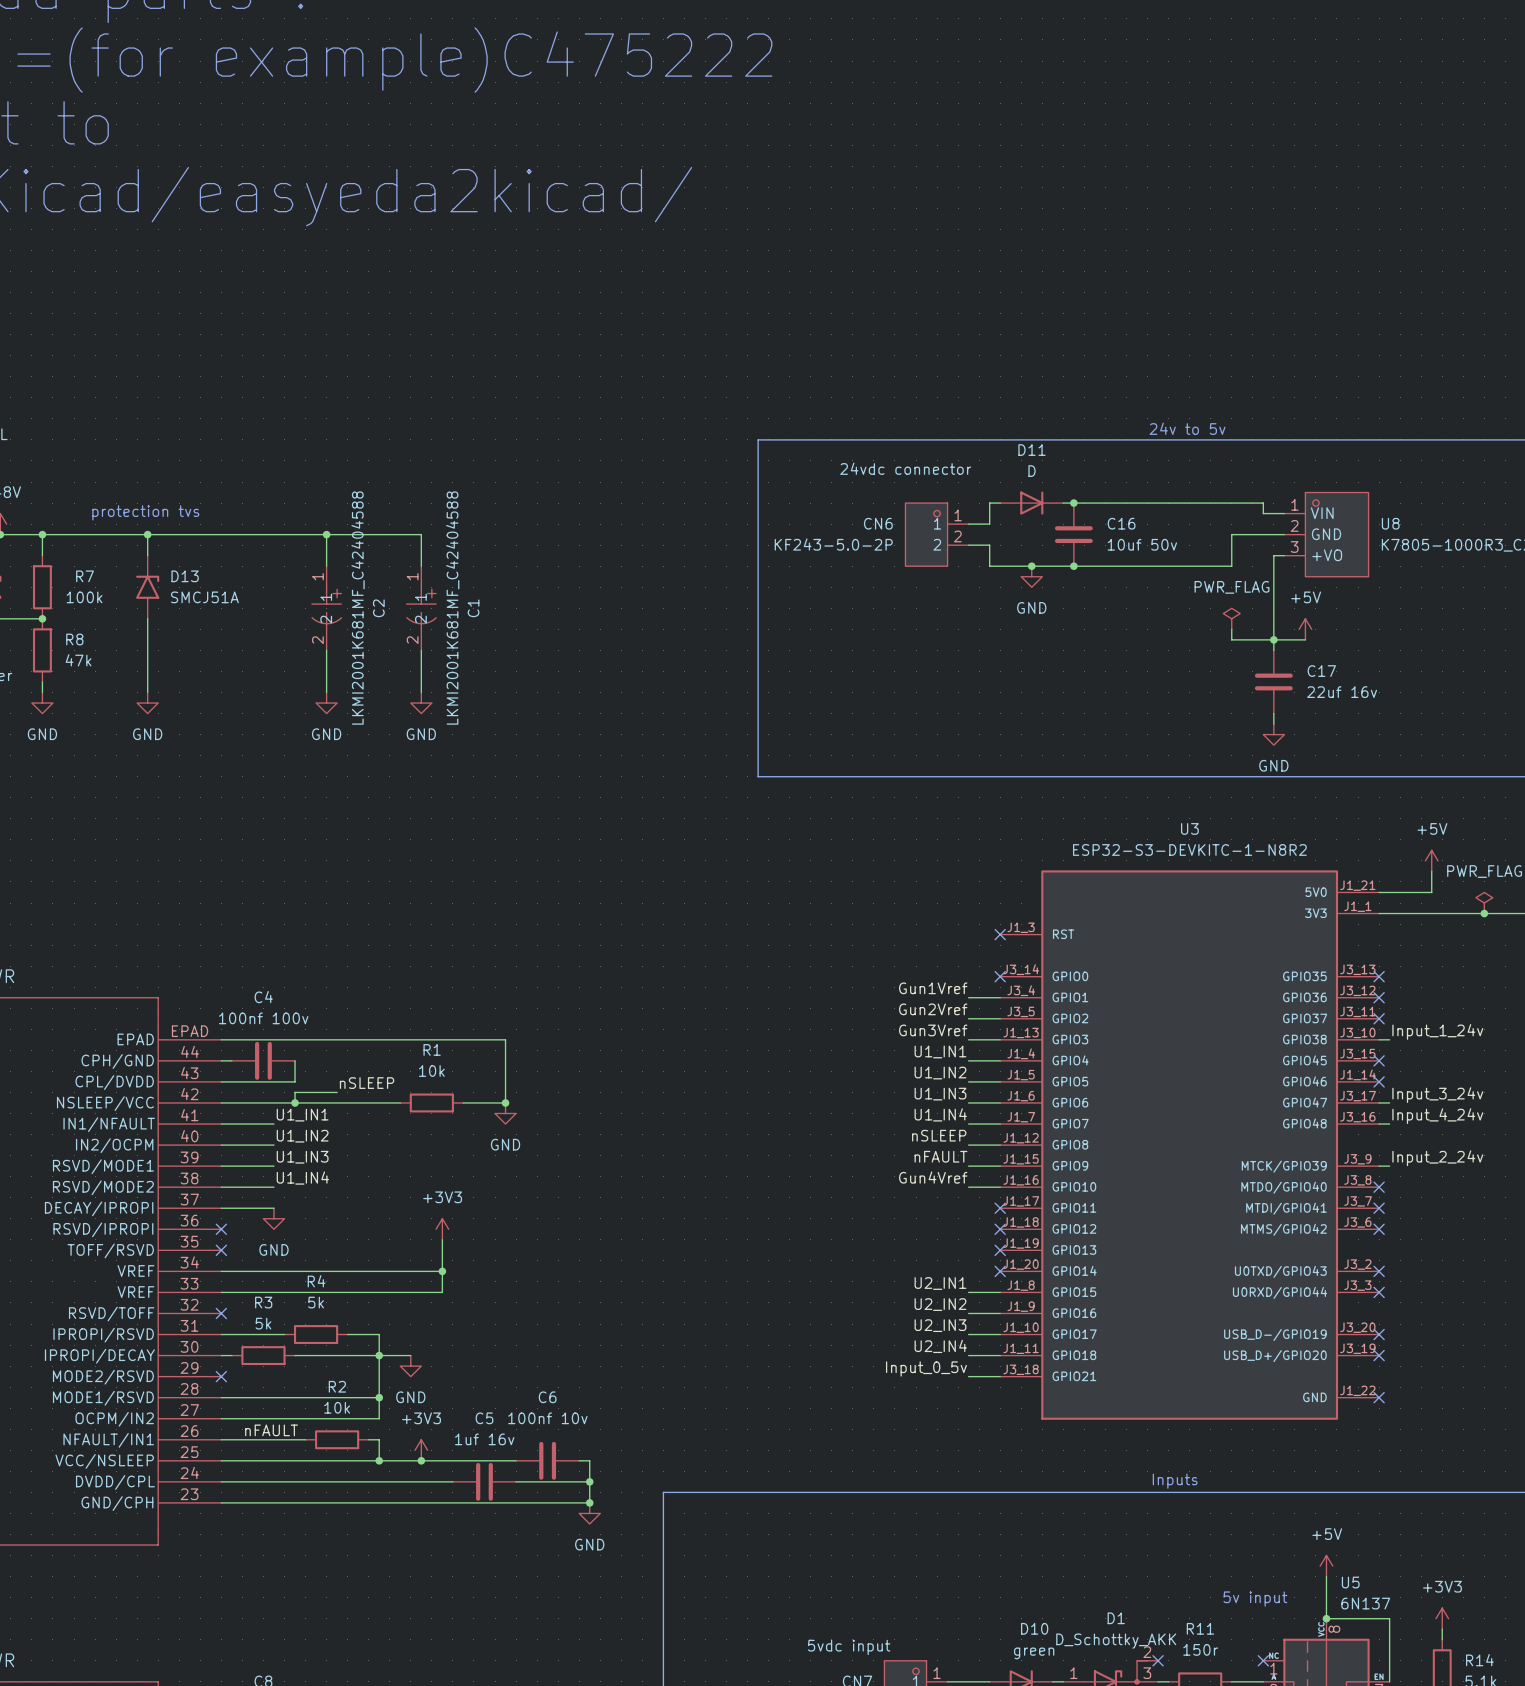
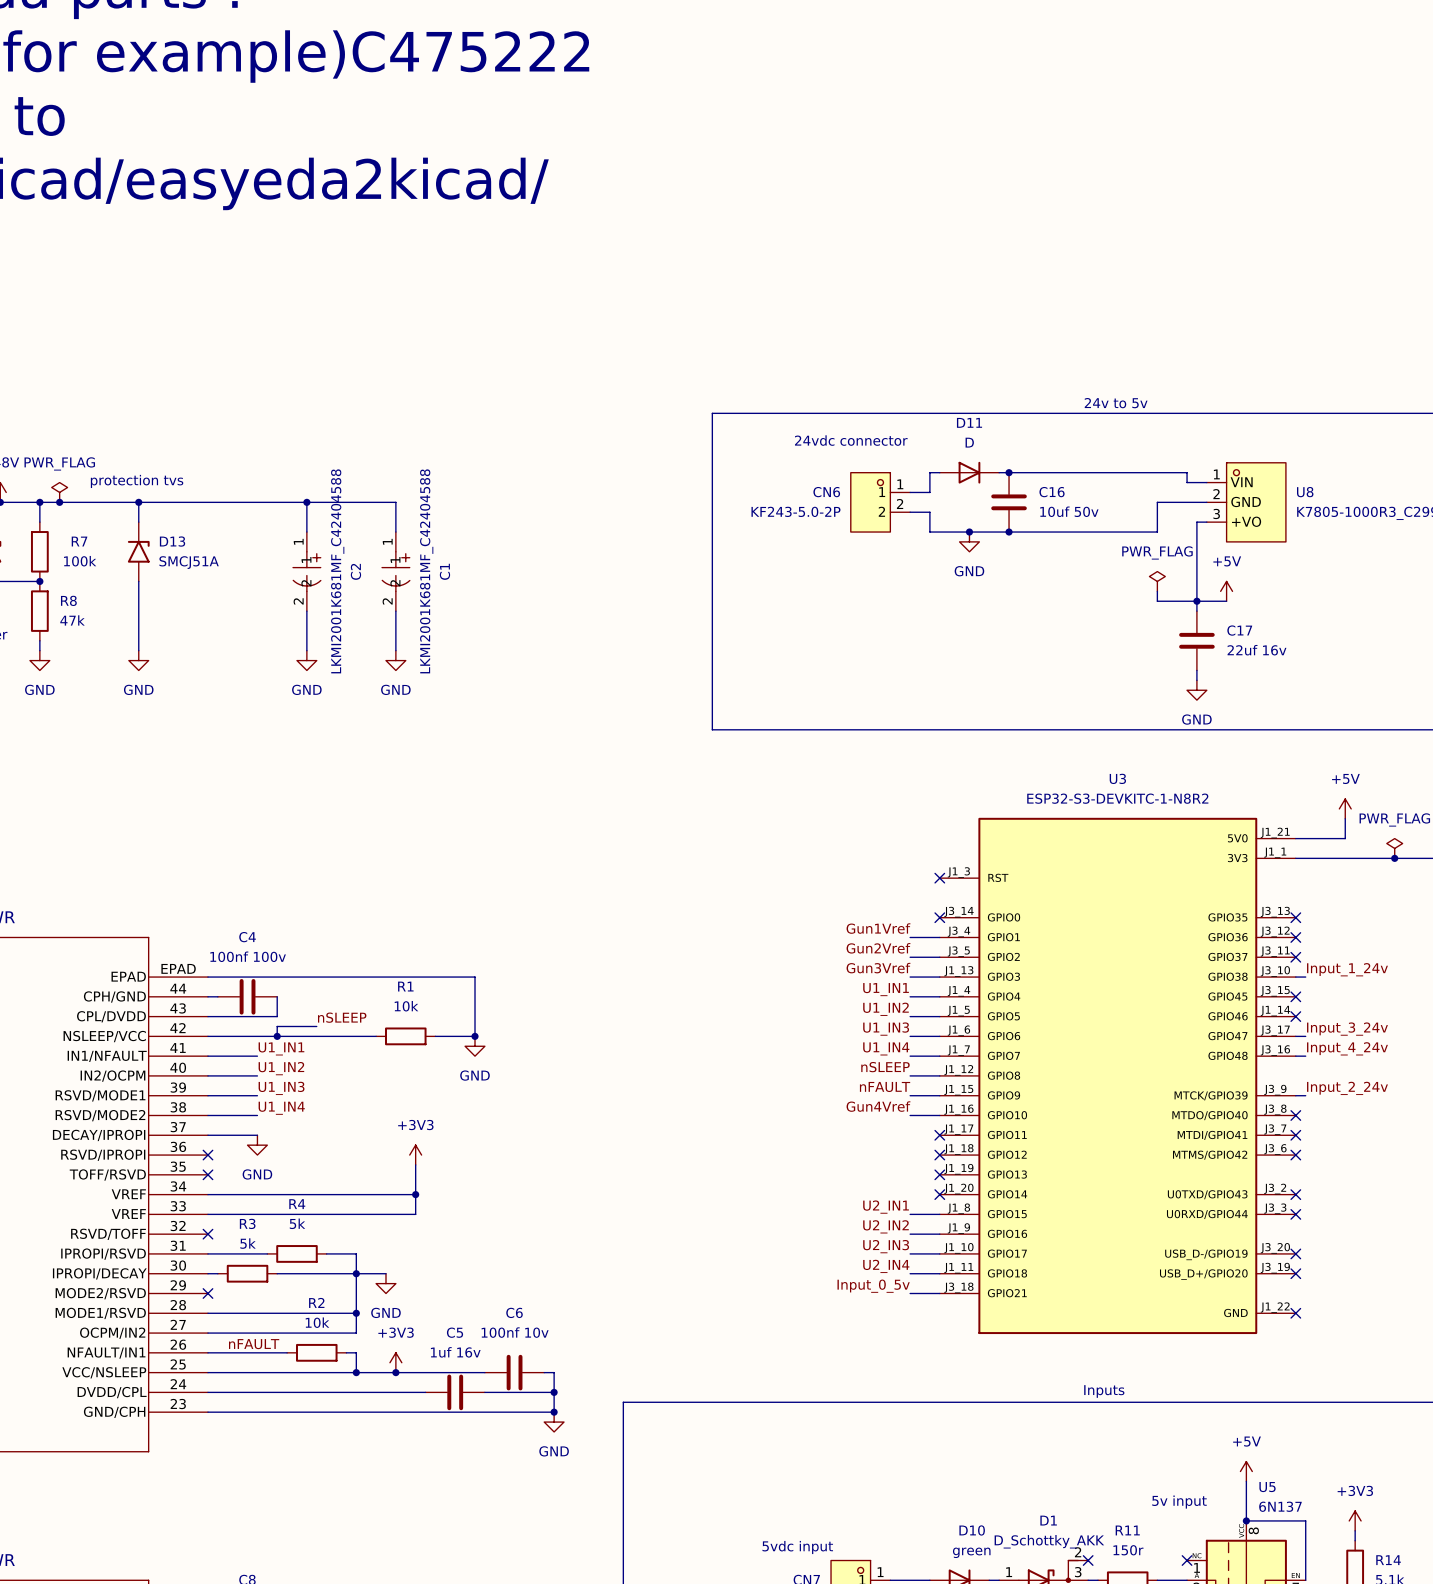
power symbol: none -> PWR_FLAG (59, 492)
junction: none -> (59, 502)

